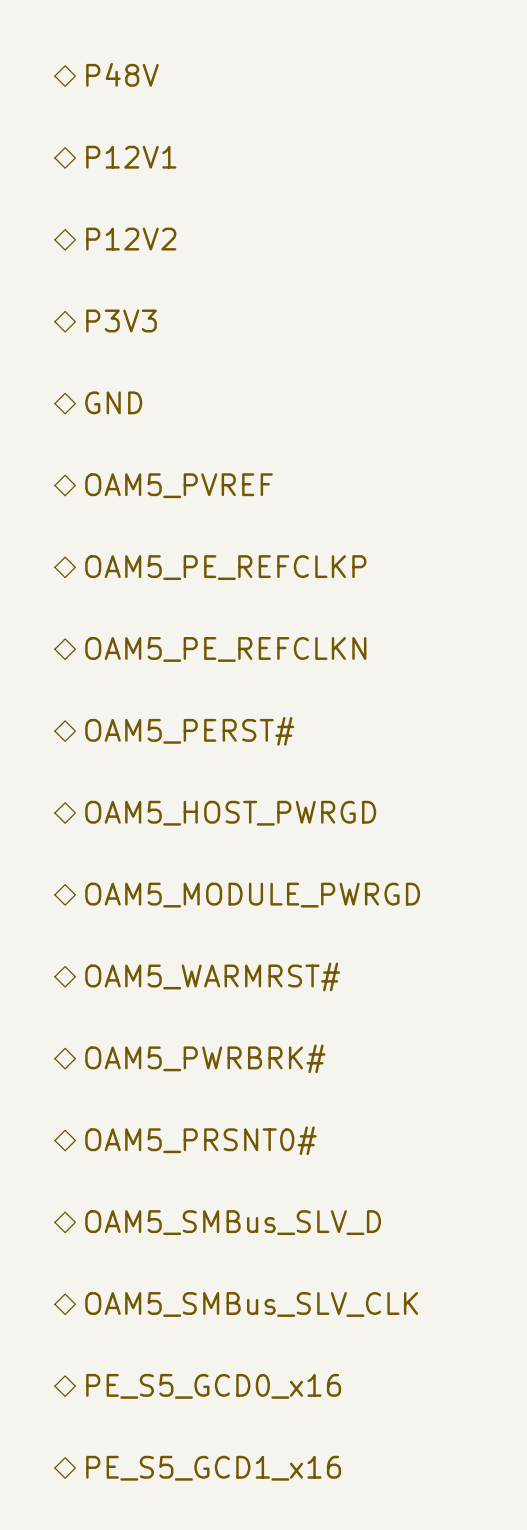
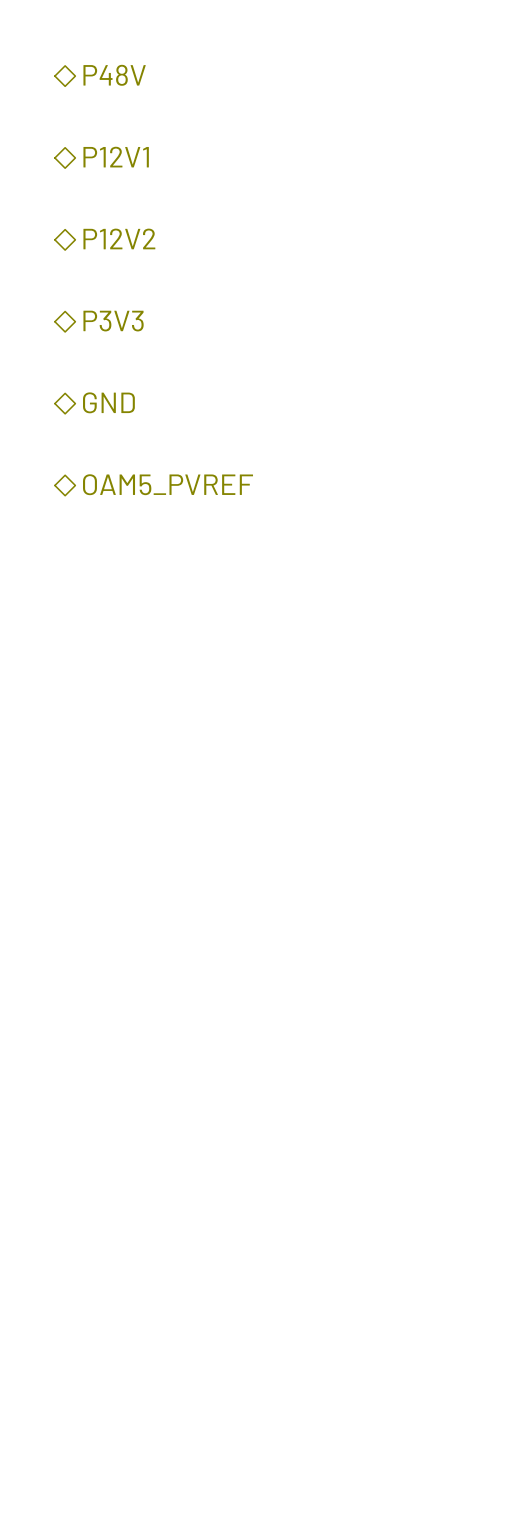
hierarchical label: OAM5_PE_REFCLKP (225, 567) -> none
hierarchical label: OAM5_PE_REFCLKN (225, 649) -> none
hierarchical label: OAM5_PERST# (189, 731) -> none
hierarchical label: OAM5_HOST_PWRGD (230, 813) -> none
hierarchical label: OAM5_MODULE_PWRGD (252, 895) -> none
hierarchical label: OAM5_WARMRST# (212, 976) -> none
hierarchical label: OAM5_PWRBRK# (205, 1058) -> none
hierarchical label: OAM5_PRSNT0# (200, 1140) -> none
hierarchical label: OAM5_SMBus_SLV_D (233, 1222) -> none
hierarchical label: OAM5_SMBus_SLV_CLK (251, 1304) -> none
hierarchical label: PE_S5_GCD0_x16 (213, 1386) -> none
hierarchical label: PE_S5_GCD1_x16 (213, 1468) -> none

